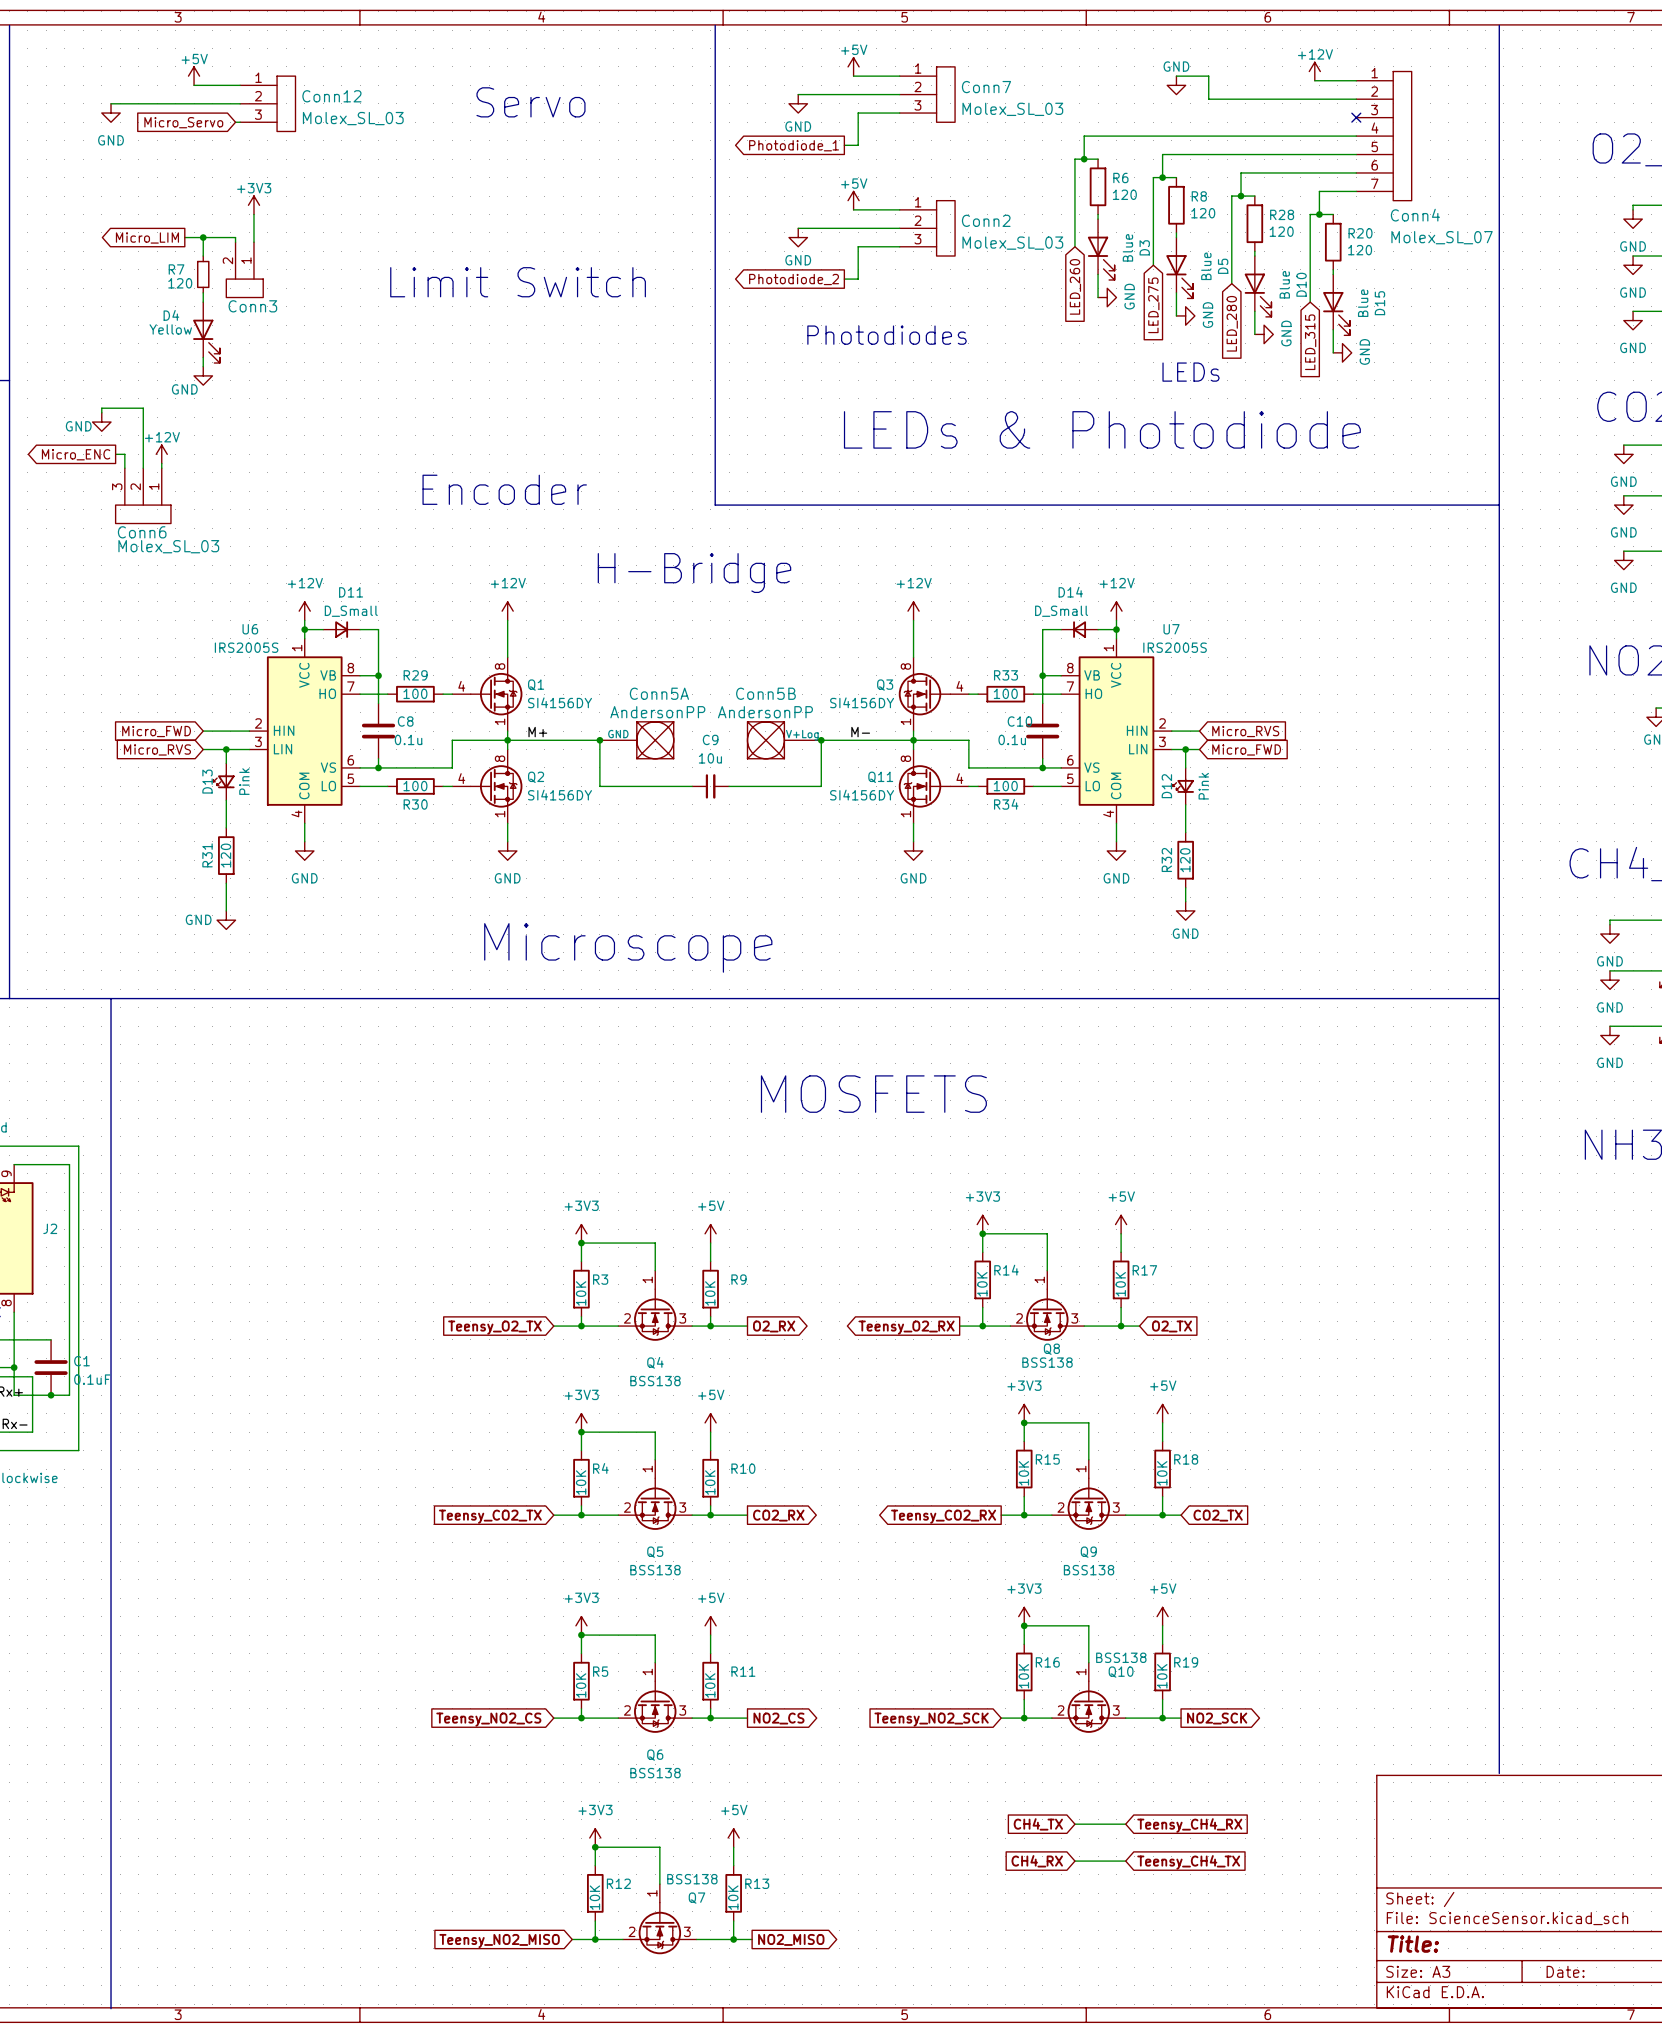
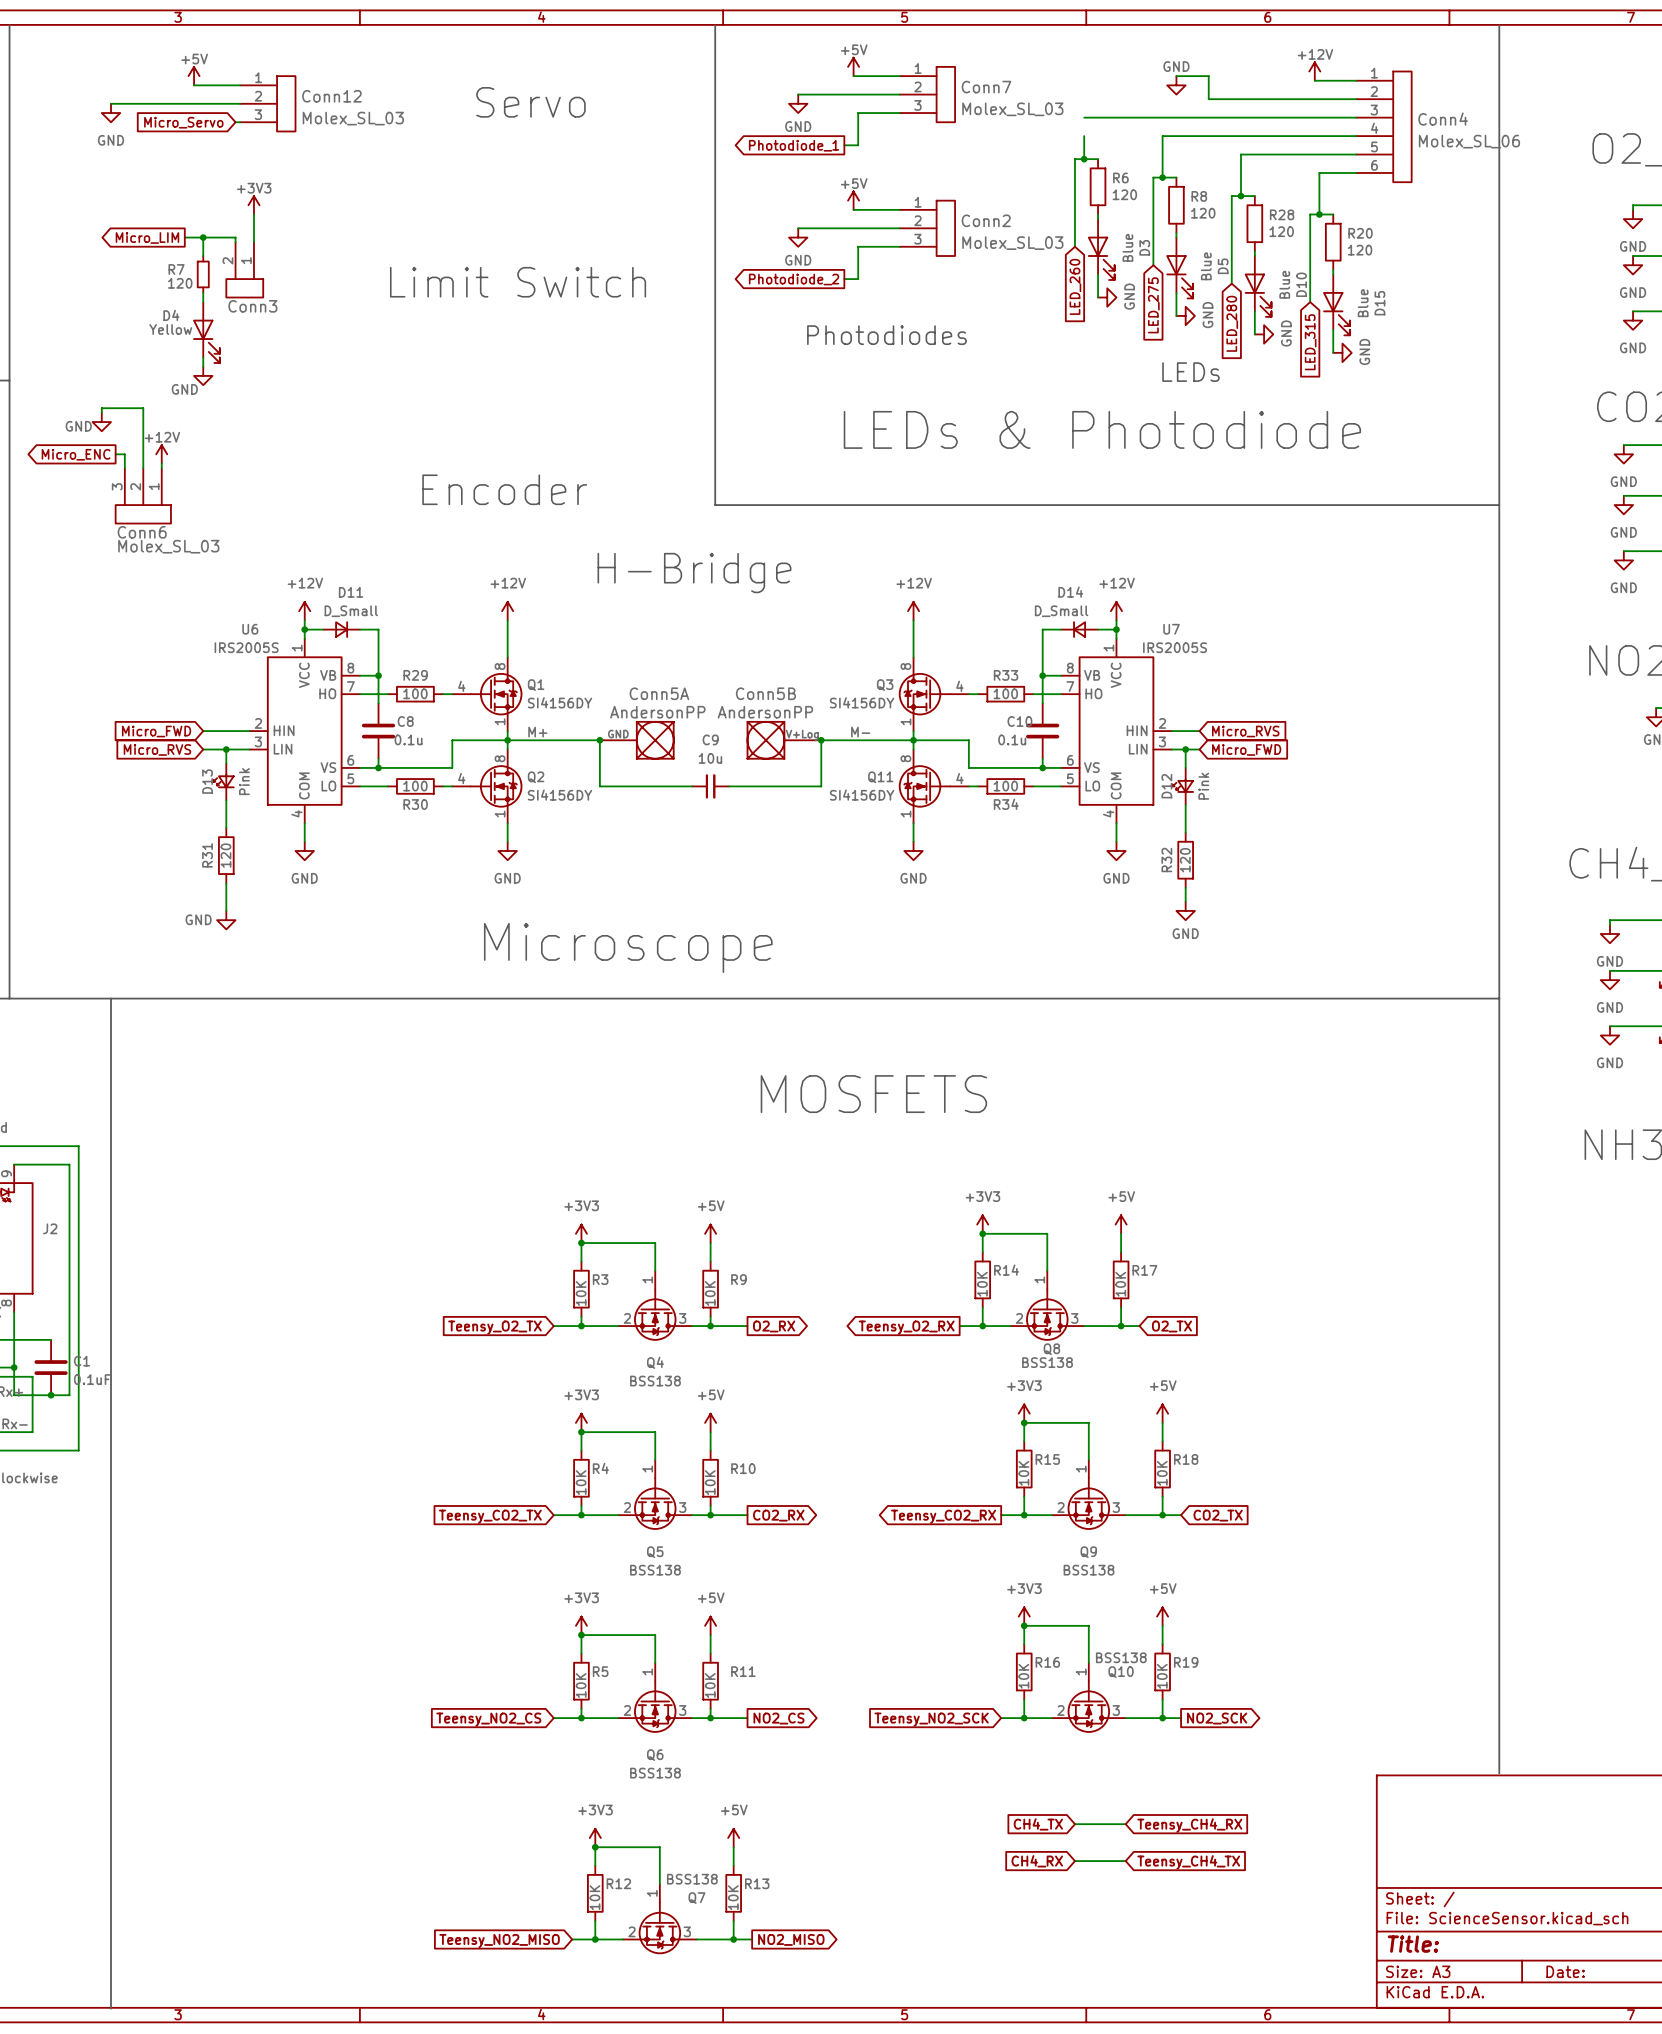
Conn4 symbol: [1356, 71, 1412, 201] -> [1356, 71, 1412, 183]
wire: none -> (1084, 117) (1356, 117)
no-connect mark: (1356, 117) -> none
wire: (1084, 136) (1162, 136) -> (1162, 154) (1162, 136)
wire: (1162, 154) (1241, 154) -> (1241, 172) (1241, 154)
wire: (1241, 172) (1319, 172) -> none
wire: (1319, 191) (1356, 191) -> (1319, 191) (1319, 172)
Conn4 name position: Conn4 (1415, 215) -> Conn4 (1443, 119)
Conn4 value: Molex_SL_07 (1442, 237) -> Molex_SL_06 (1469, 141)

